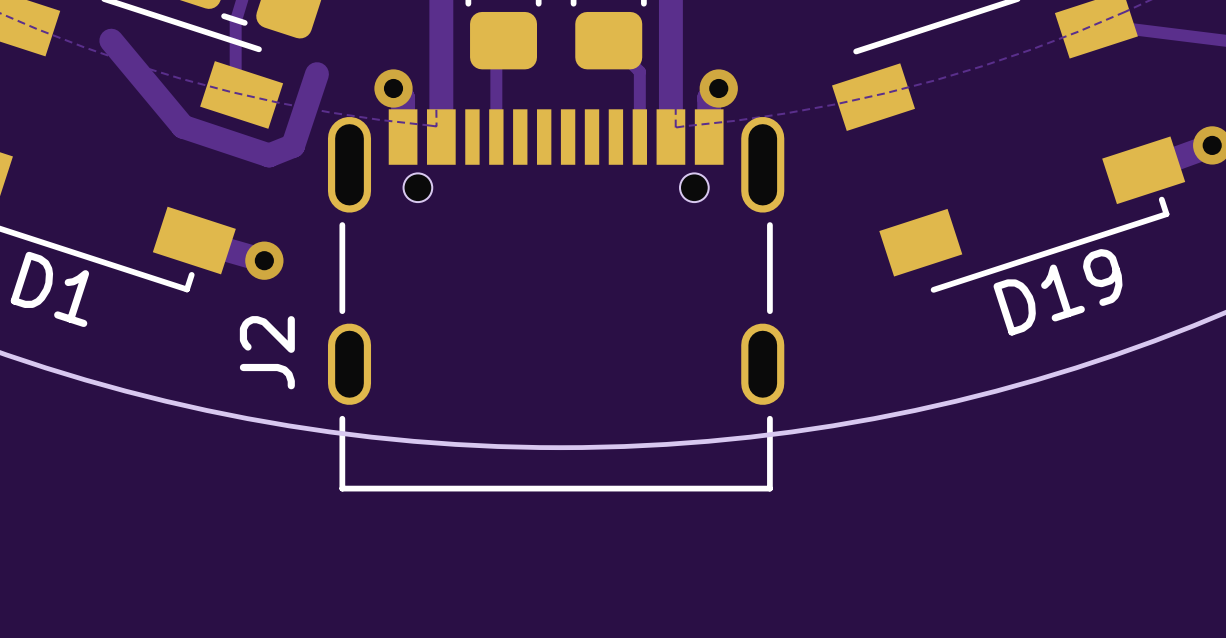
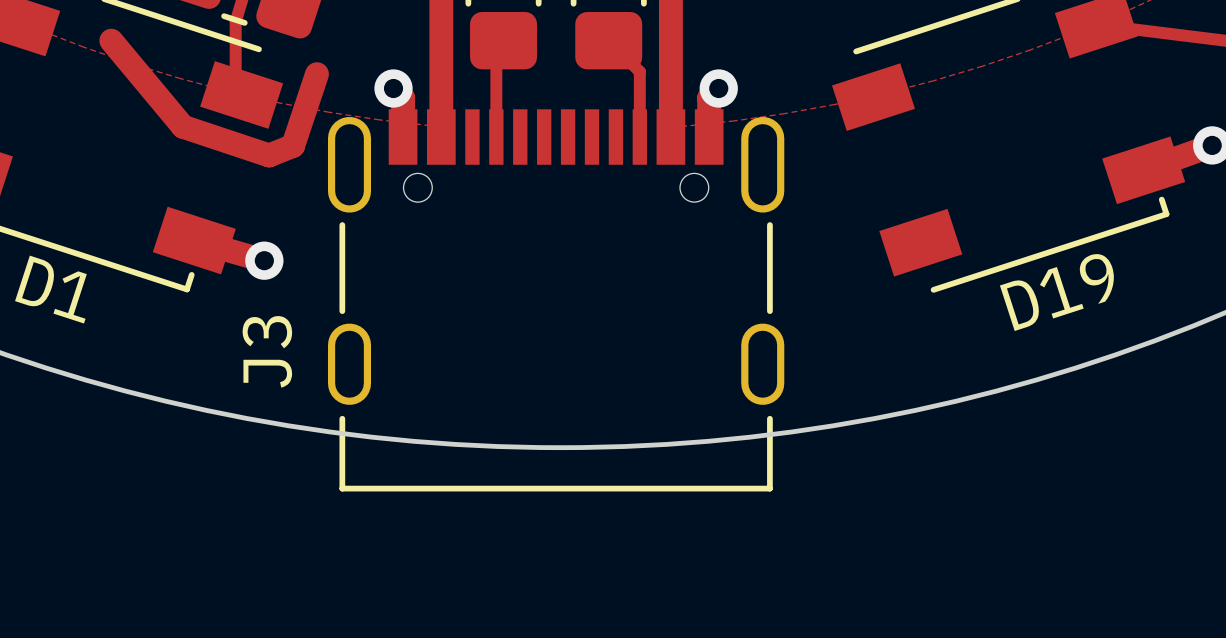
J2 name: J2 (267, 352) -> J3 (267, 351)

